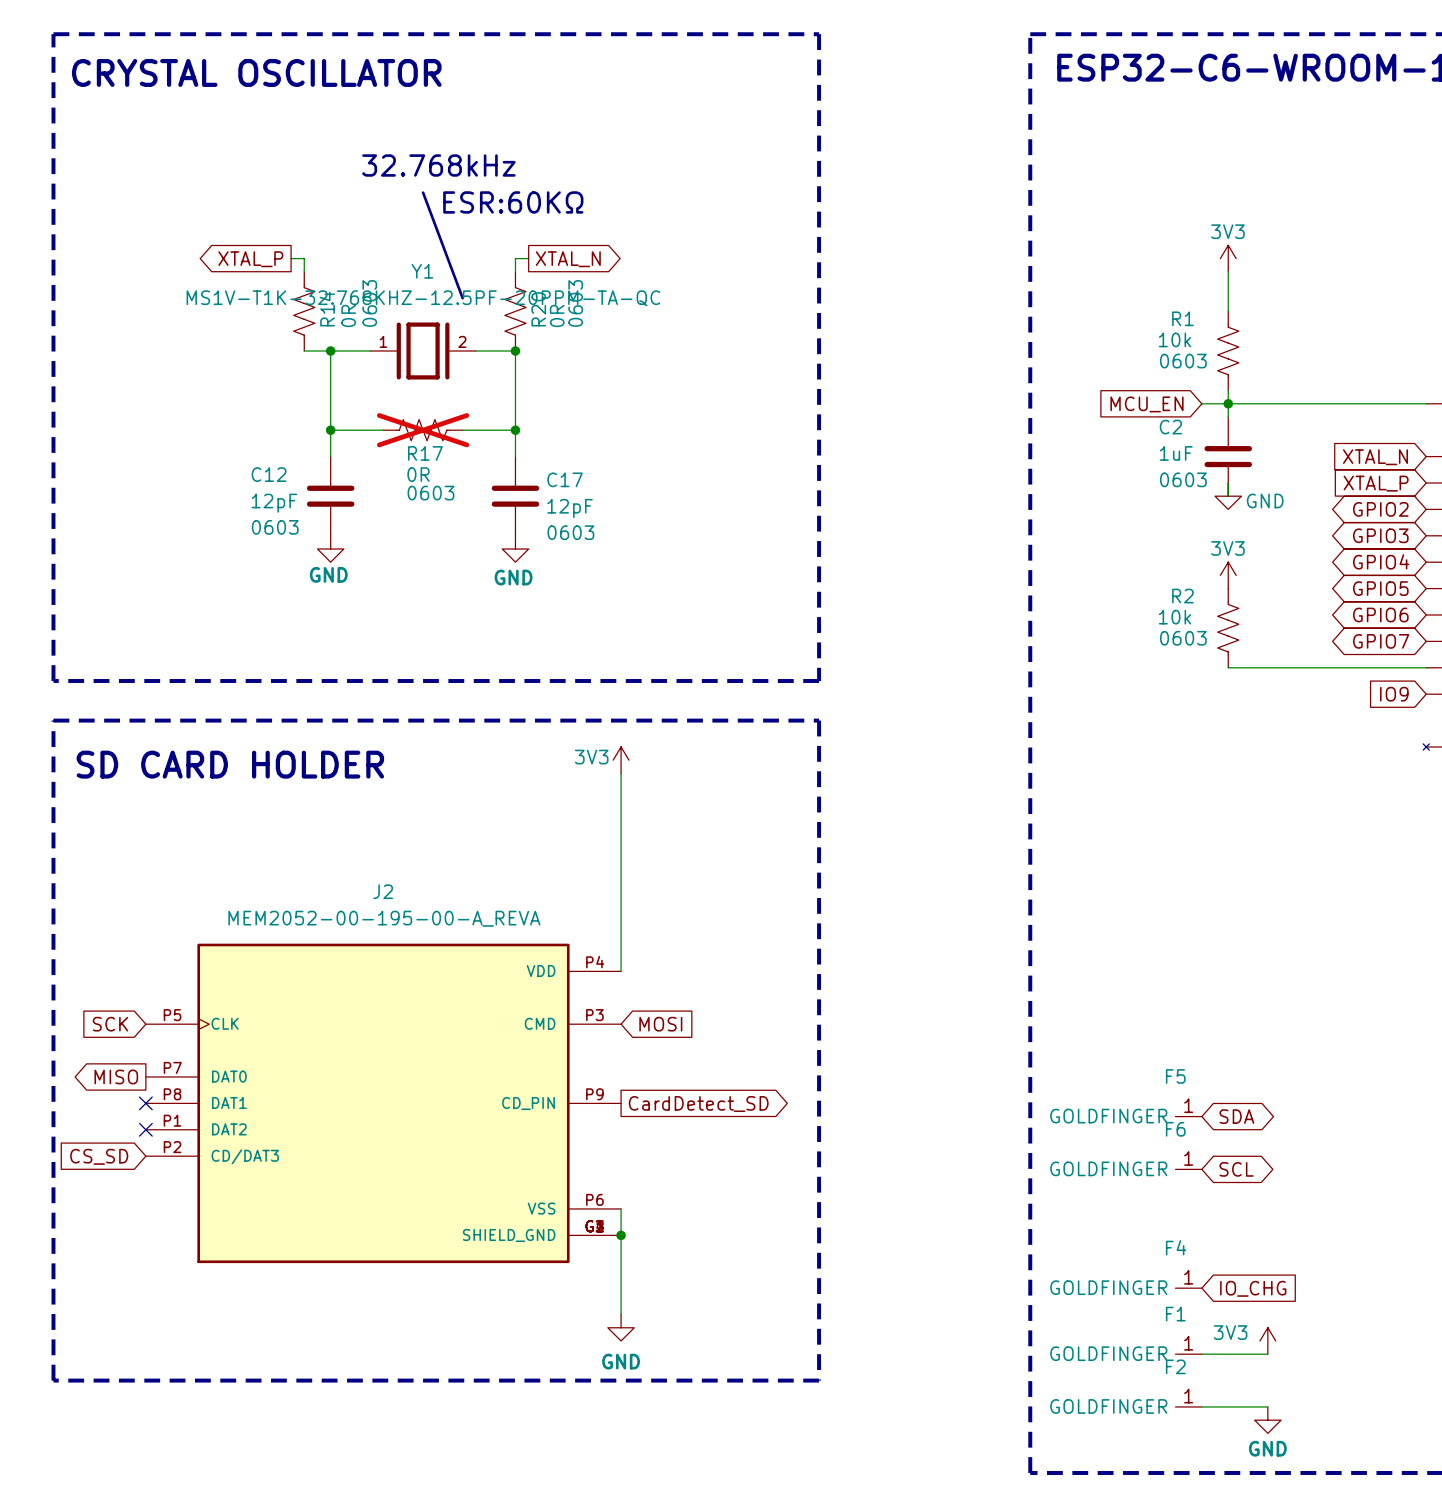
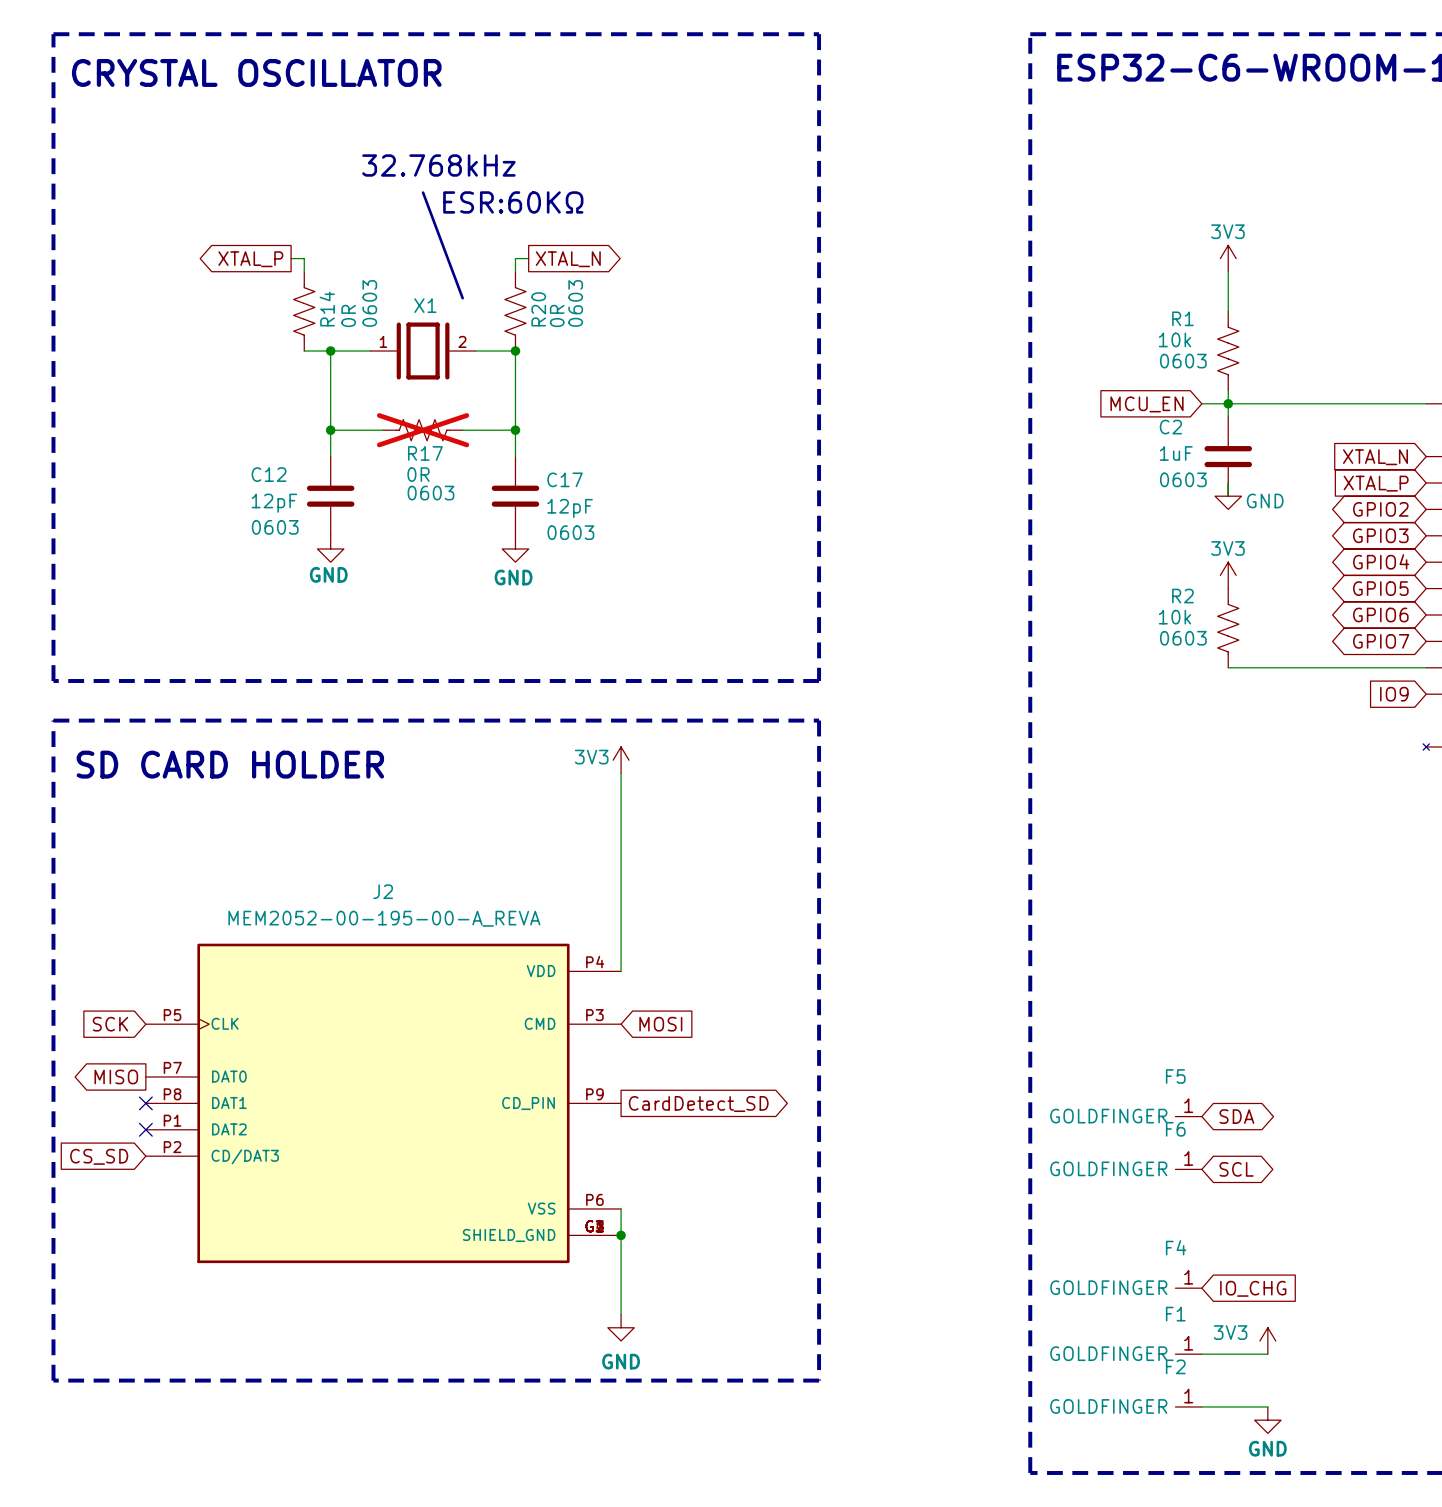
Y1 name: Y1 (422, 271) -> X1 (425, 305)
Y1 value: MS1V-T1K-32.768KHZ-12.5PF-20PPM-TA-QC (423, 298) -> none

